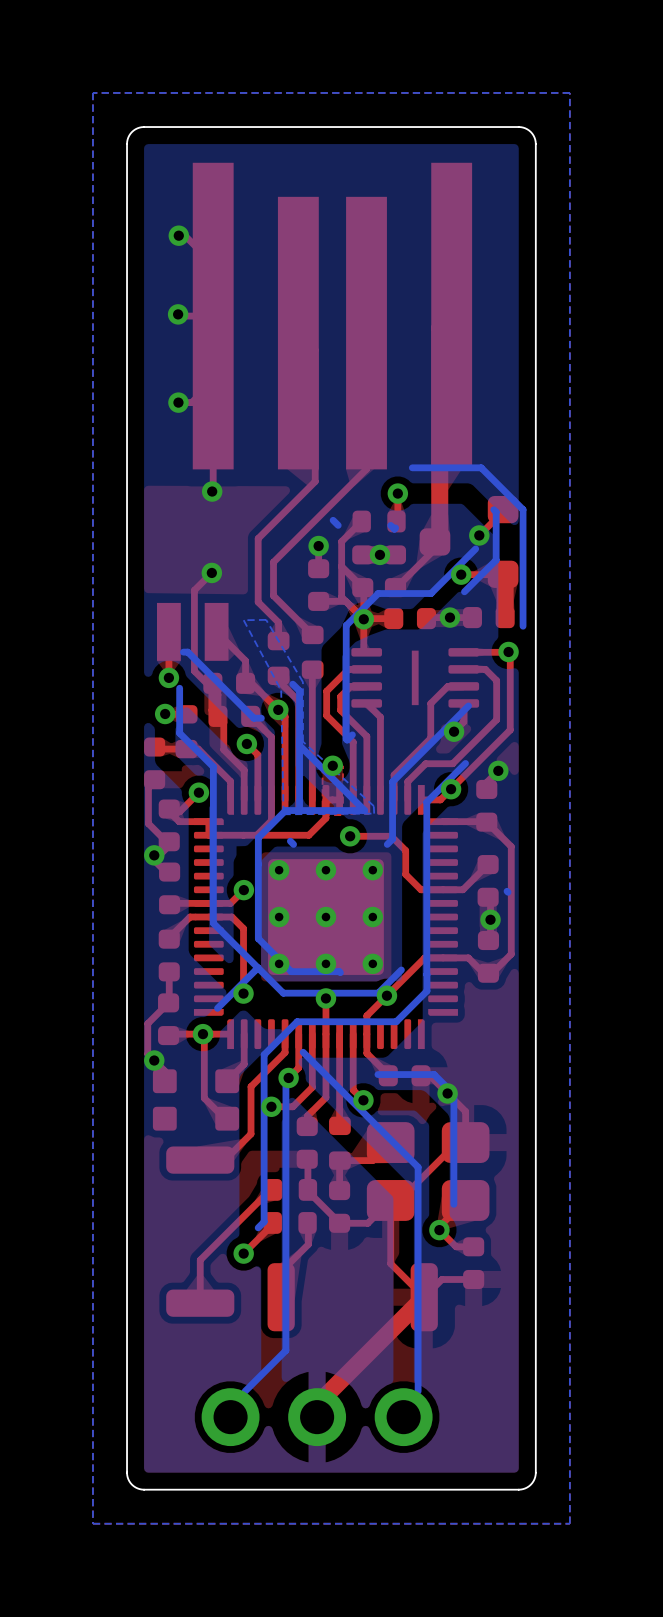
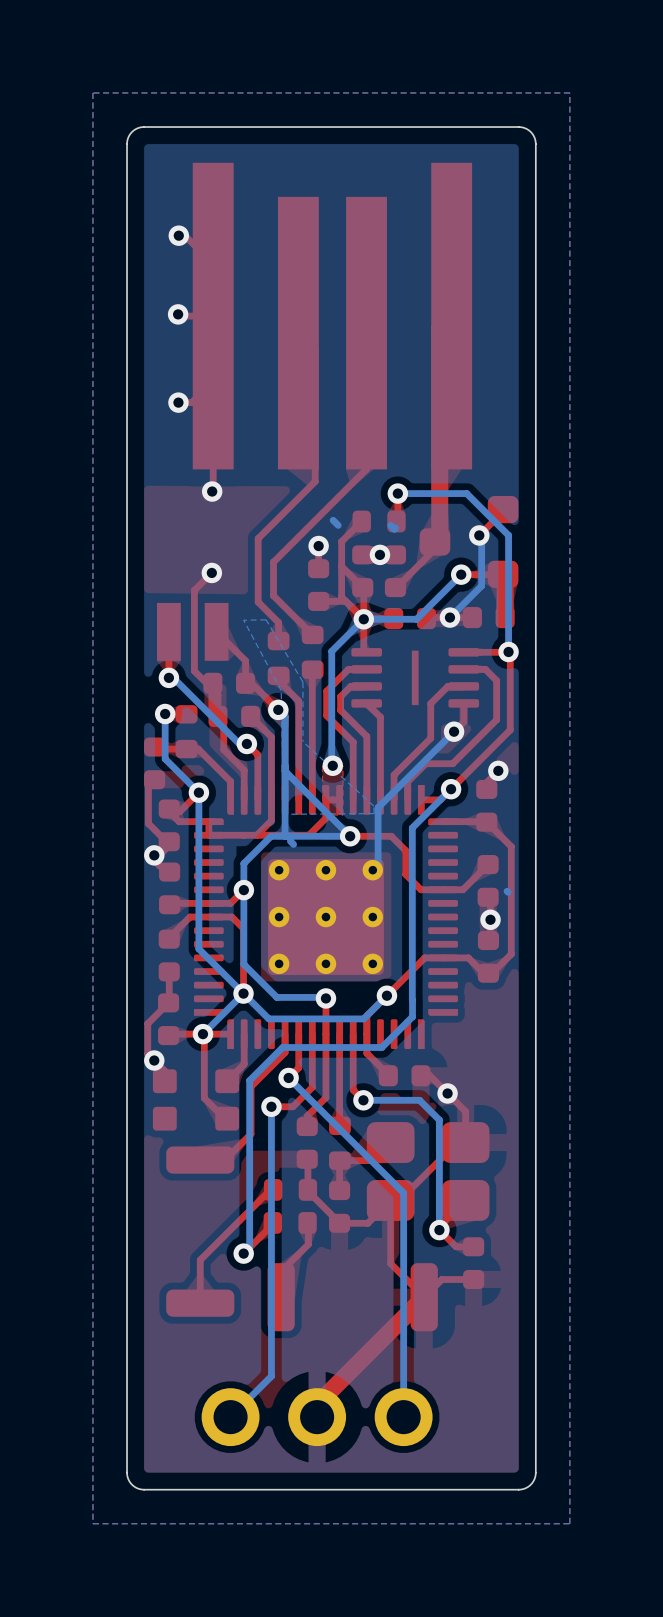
bottom track: (412, 467) (481, 467) (523, 509) (523, 626) -> (397, 493) (466, 493) (508, 535) (508, 651)
bottom track: (493, 509) (496, 512) (496, 560) (464, 591) -> (479, 535) (481, 537) (481, 585) (449, 617)
bottom track: (475, 548) (431, 593) (378, 593) (346, 625) (346, 738) (352, 734) -> (461, 574) (416, 619) (363, 619) (331, 651) (331, 764) (337, 760)
bottom track: (183, 652) (187, 652) (253, 718) (261, 718) -> (168, 677) (173, 677) (239, 743) (246, 743)
bottom track: (292, 684) (299, 690) (299, 810) -> (278, 709) (285, 716) (285, 836)
bottom track: (179, 688) (179, 733) (213, 766) (213, 923) (283, 993) (378, 993) (401, 969) -> (165, 713) (165, 758) (198, 792) (198, 948) (268, 1018) (363, 1018) (386, 995)
bottom track: (468, 705) (392, 781) (392, 839) (387, 844) -> (454, 731) (378, 807) (378, 864) (372, 870)
bottom track: (299, 745) (364, 810) (285, 810) (258, 837) (258, 938) (291, 971) (340, 972) -> (285, 771) (350, 836) (271, 836) (243, 863) (243, 964) (276, 997) (325, 998)
bottom track: (465, 763) (426, 802) (426, 991) (396, 1021) (297, 1021) (264, 1054) (264, 1221) (258, 1227) -> none
bottom track: none -> (451, 789) (412, 827) (412, 1016) (381, 1047) (282, 1047) (249, 1080) (249, 1247) (243, 1253)
bottom track: (258, 967) (217, 1008) -> (243, 993) (202, 1034)
bottom track: (303, 1052) (418, 1167) (418, 1391) -> (288, 1077) (403, 1192) (403, 1417)
bottom track: (377, 1074) (434, 1074) (453, 1094) (453, 1204) -> (363, 1100) (419, 1100) (439, 1120) (439, 1230)
bottom track: (285, 1081) (285, 1350) (245, 1391) -> (271, 1106) (271, 1376) (230, 1417)

